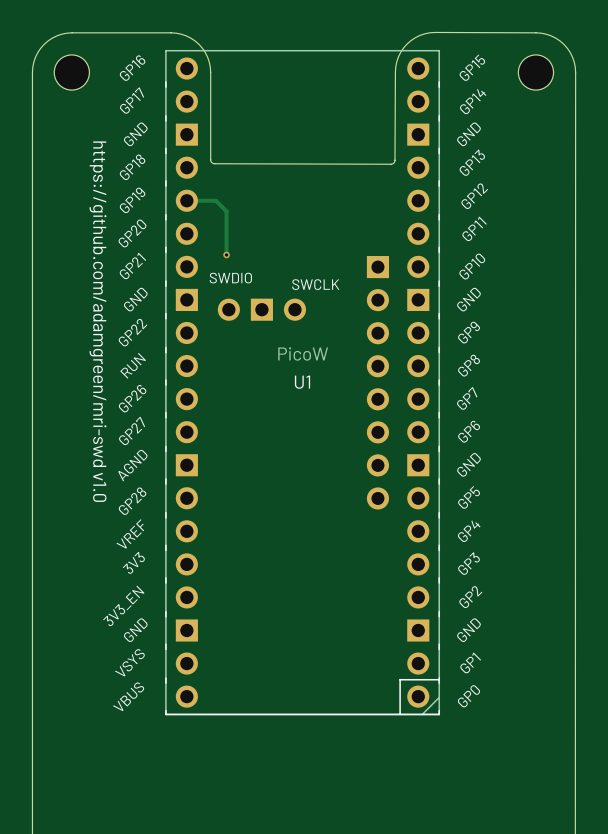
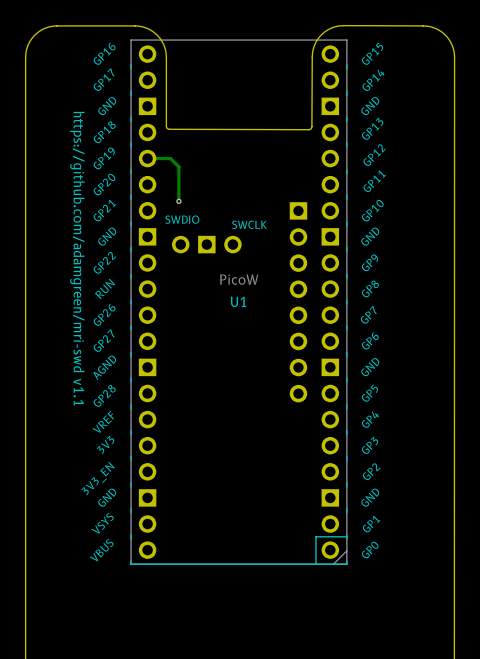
part: (71, 72) -> none
part: (535, 72) -> none
text: https://github.com/adamgreen/mri-swd v1.0 (98, 321) -> https://github.com/adamgreen/mri-swd v1.1 (77, 258)

